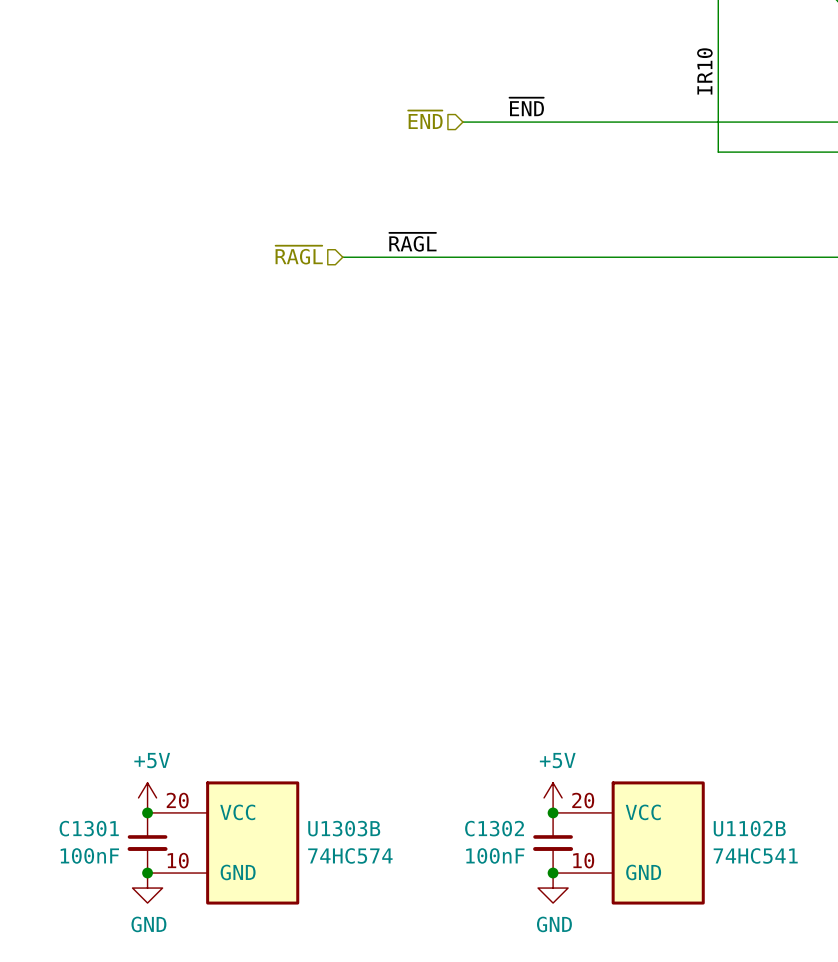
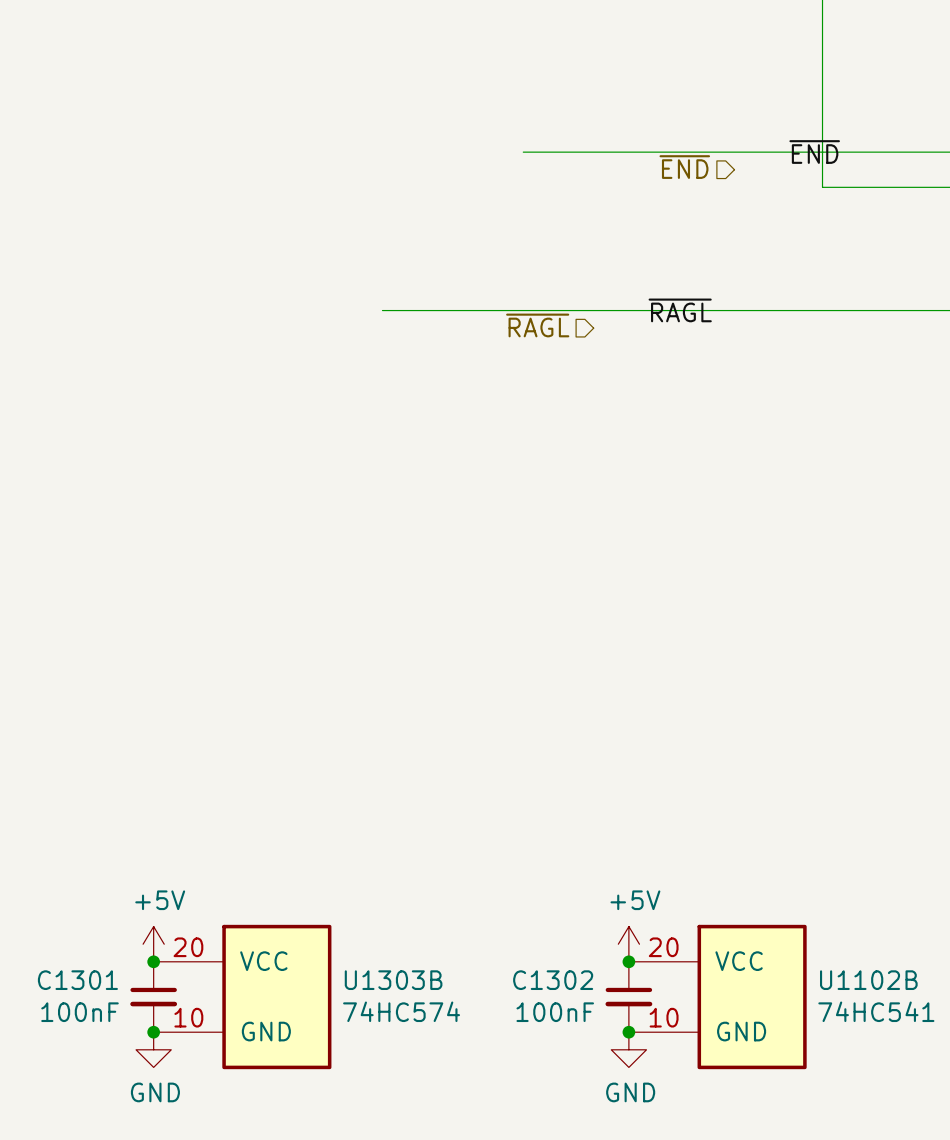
label: IR10 (704, 71) -> none
label position: ~{END} (526, 106) -> ~{END} (814, 152)
hierarchical label position: ~{END} (425, 119) -> ~{END} (684, 167)
label position: ~{RAGL} (412, 242) -> ~{RAGL} (680, 310)
hierarchical label position: ~{RAGL} (299, 255) -> ~{RAGL} (537, 325)

